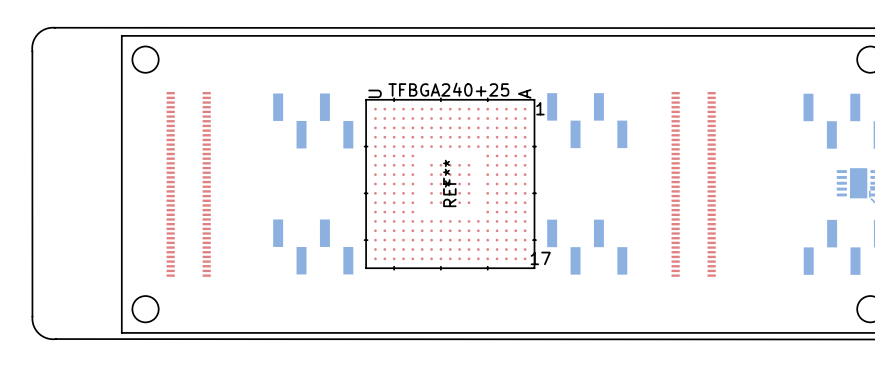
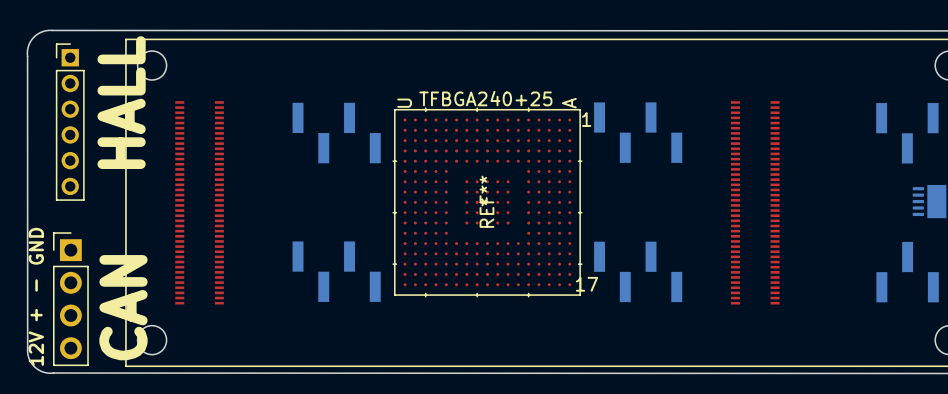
text: none -> HALL (121, 102)
part: none -> (70, 122)
text: none -> GND (36, 246)
text: none -> - (36, 285)
part: none -> (70, 299)
text: none -> CAN (123, 307)
text: none -> + (36, 315)
text: none -> 12V (36, 348)

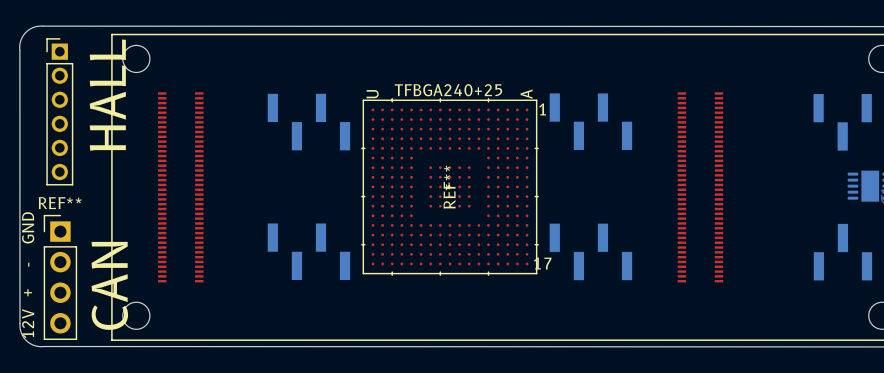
REF** name: none -> REF** (60, 203)

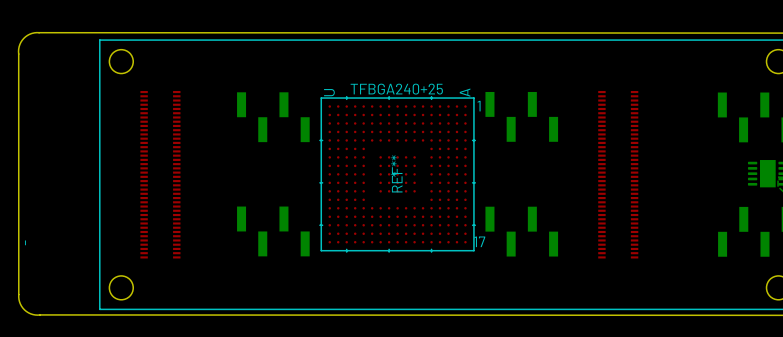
text: HALL (107, 95) -> none
part: (59, 111) -> none
text: GND (28, 227) -> none
REF**: (60, 277) -> none
text: CAN (109, 285) -> none
text: + (27, 292) -> none
text: 12V (28, 323) -> none

